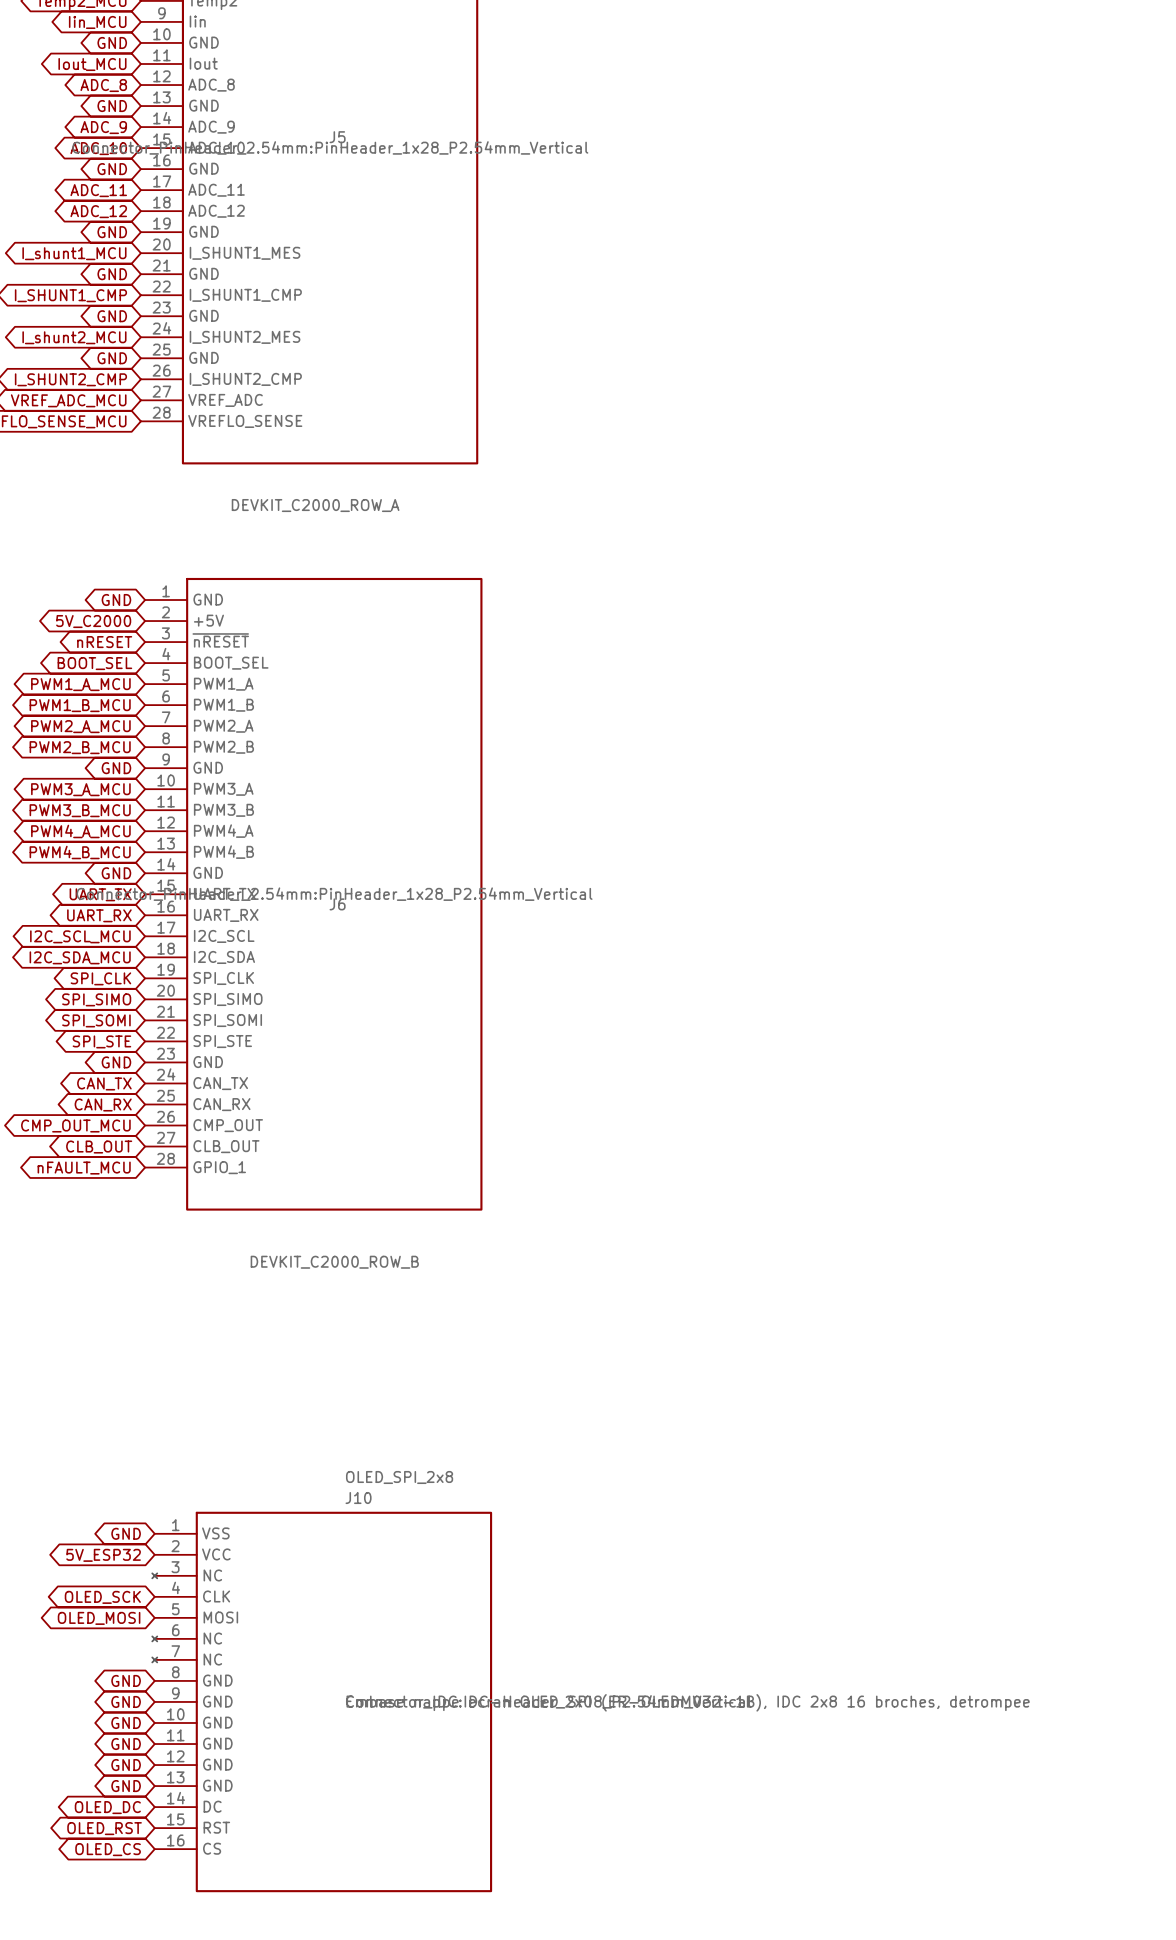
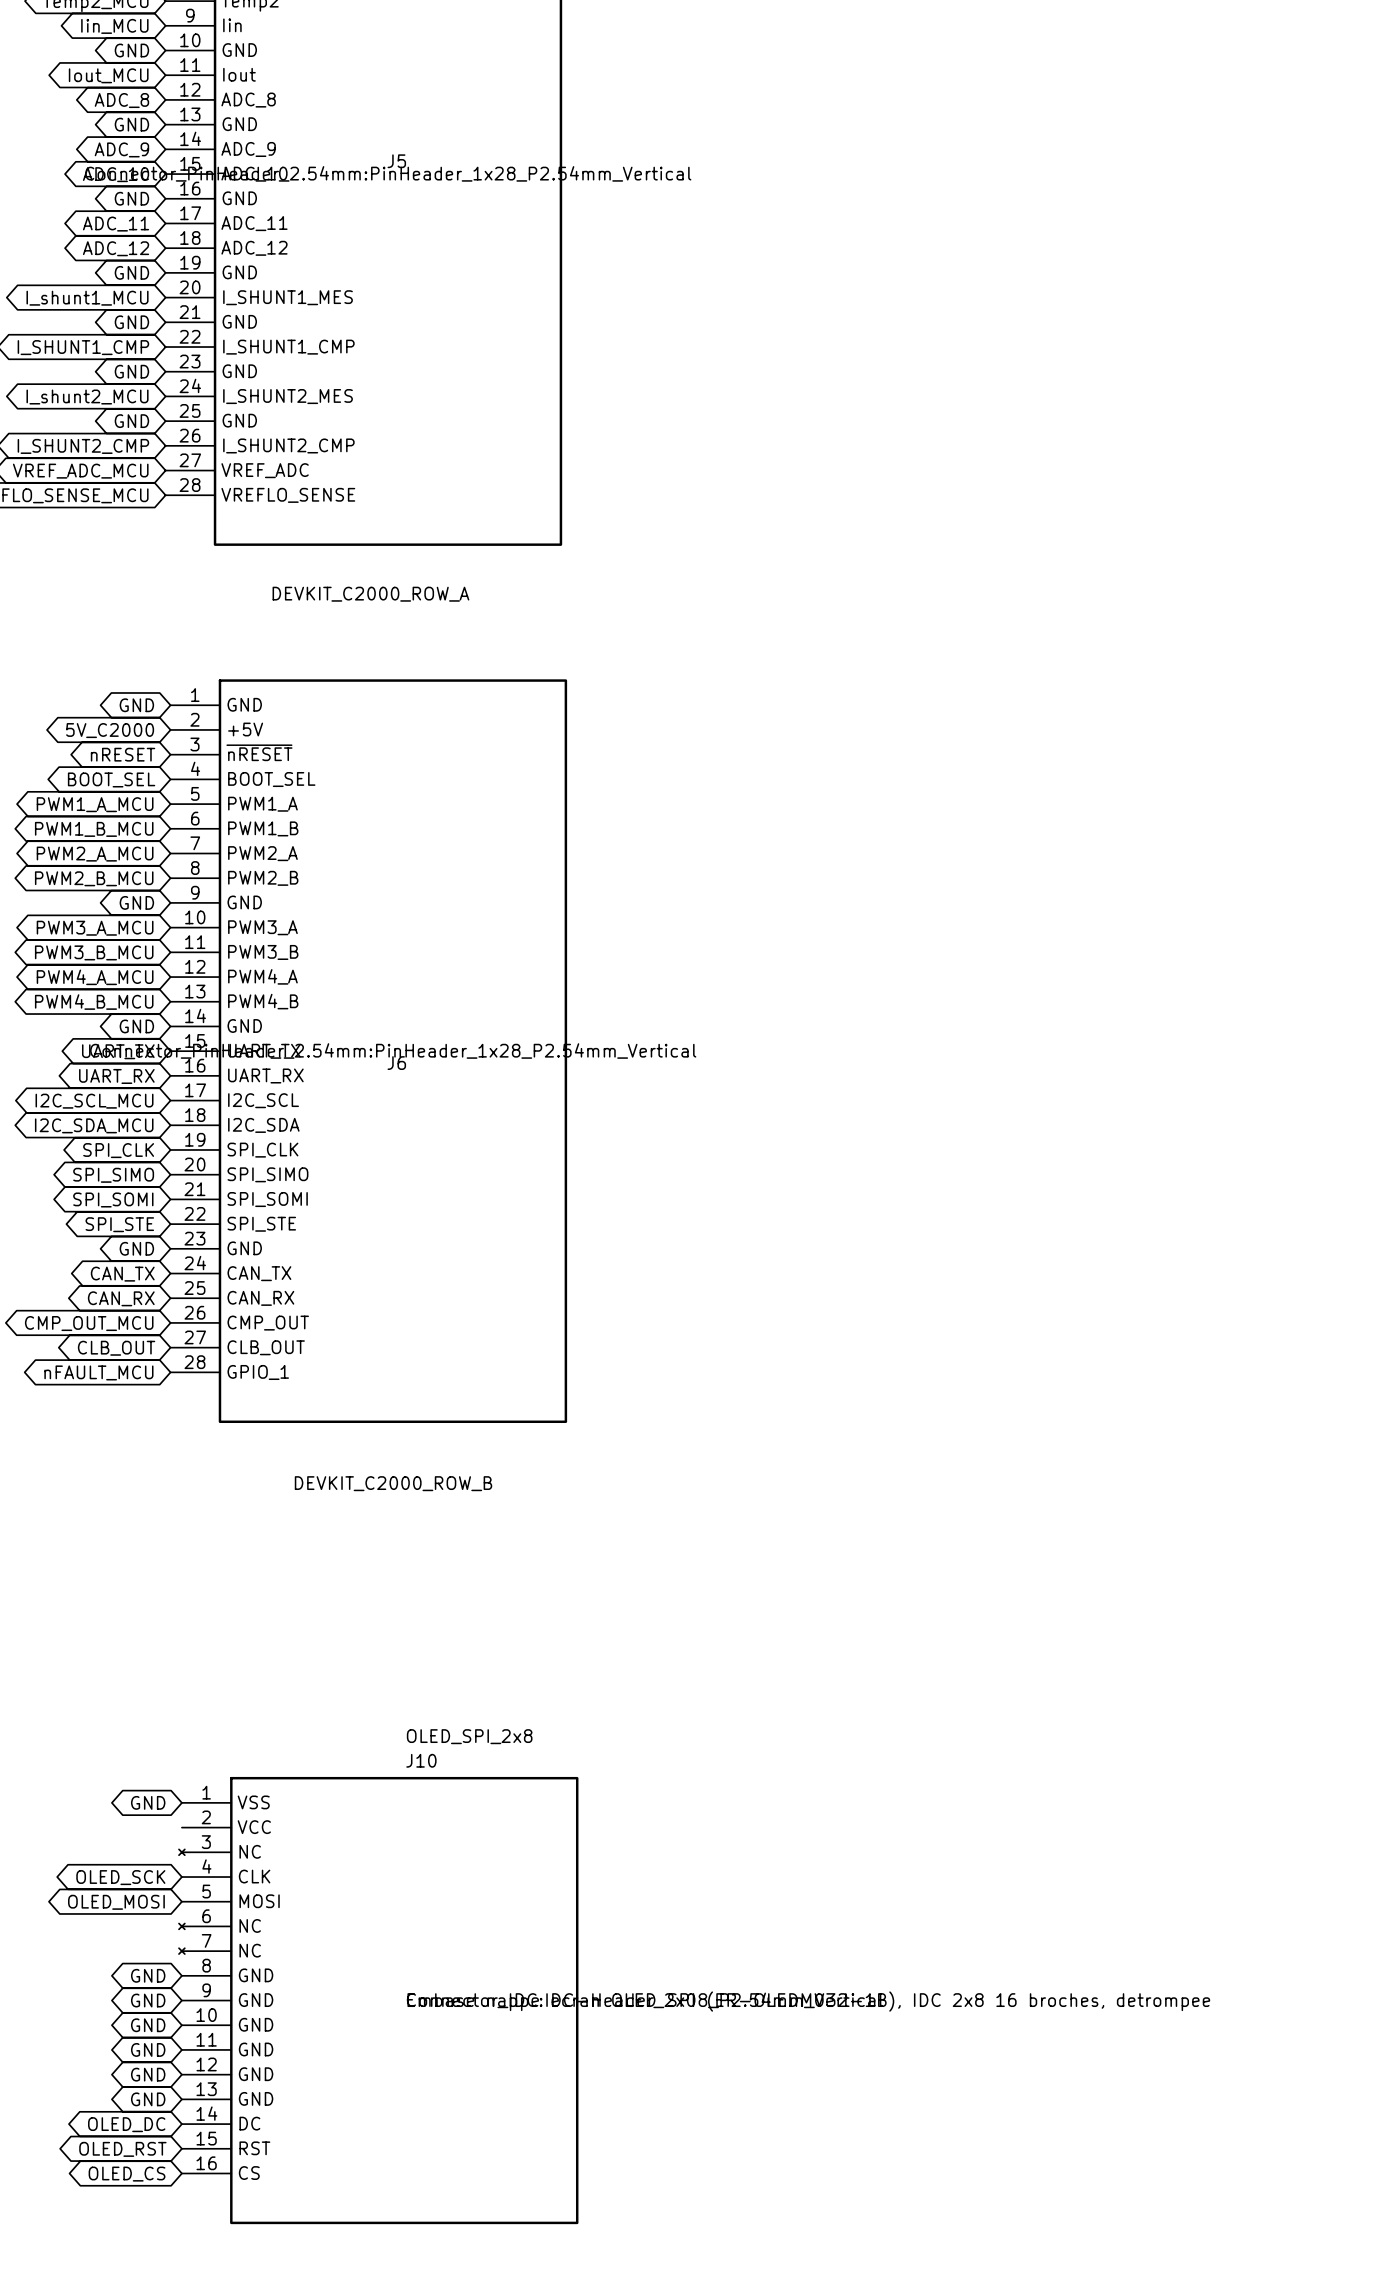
global label: 5V_ESP32 (103, 1555) -> none

